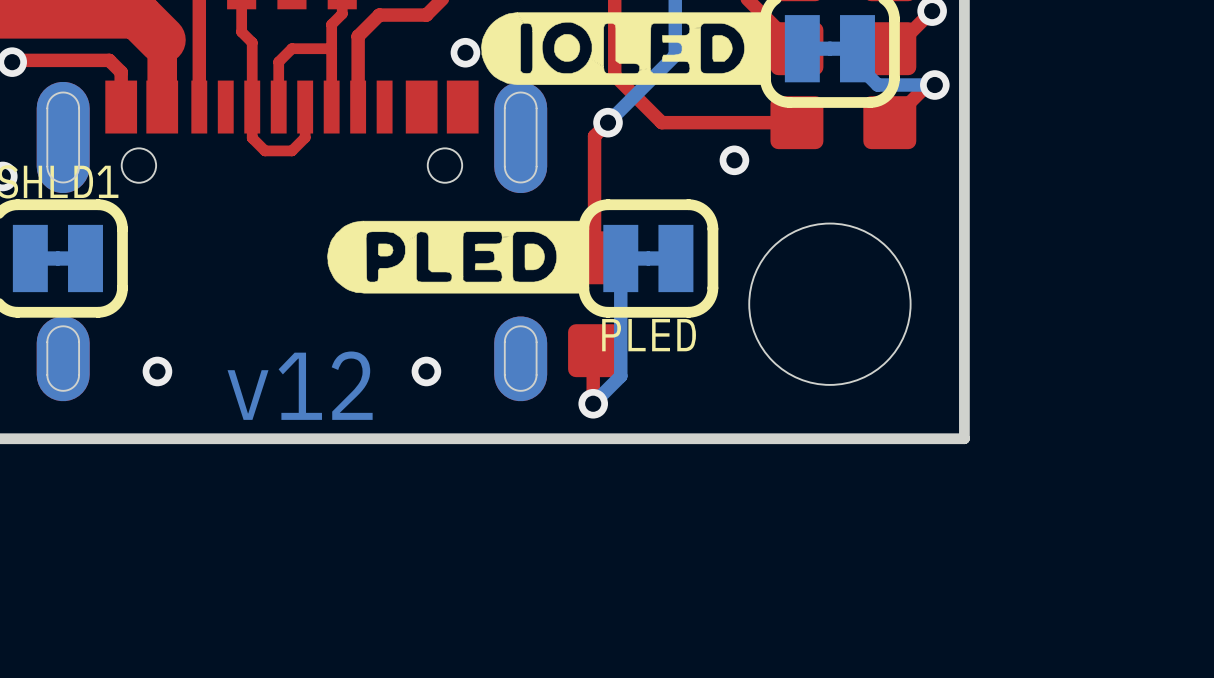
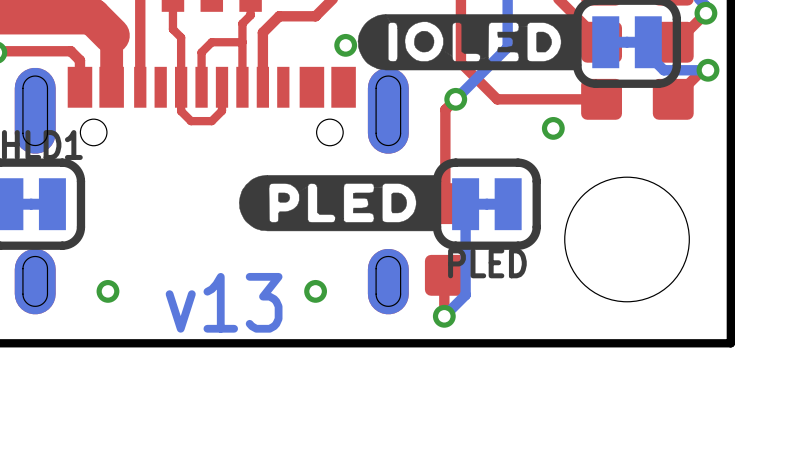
text: v12 (300, 385) -> v13 (224, 302)

